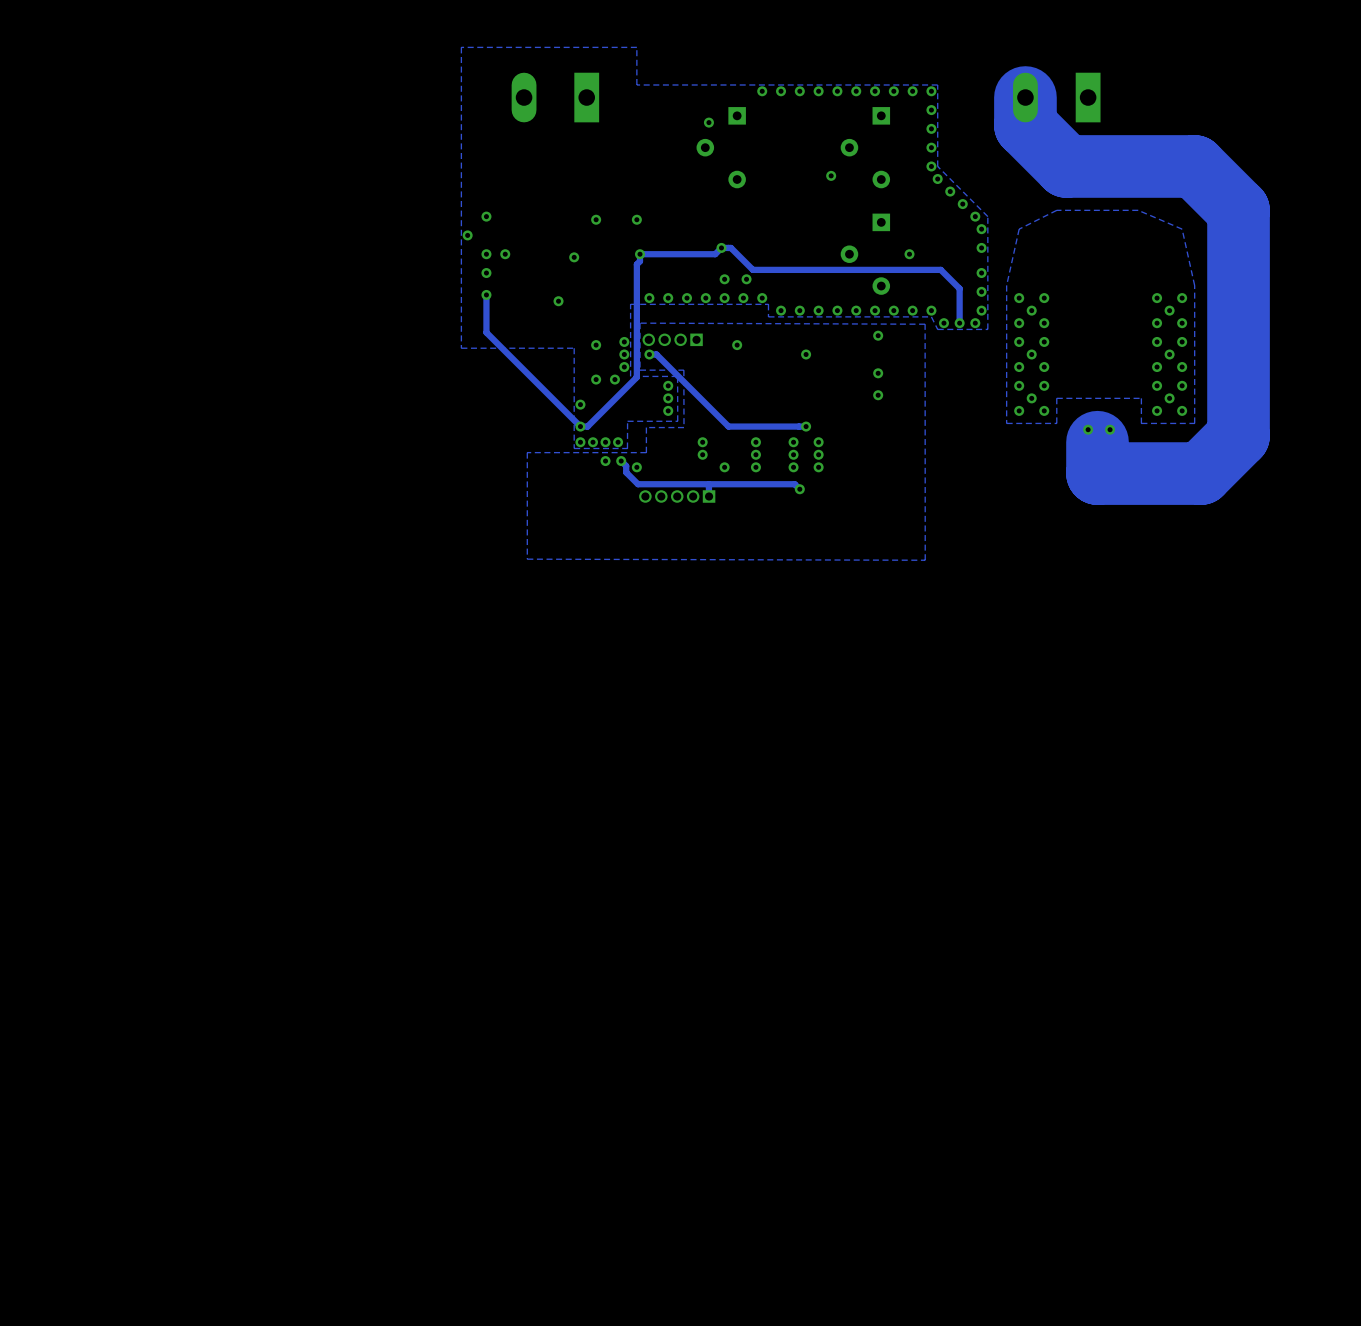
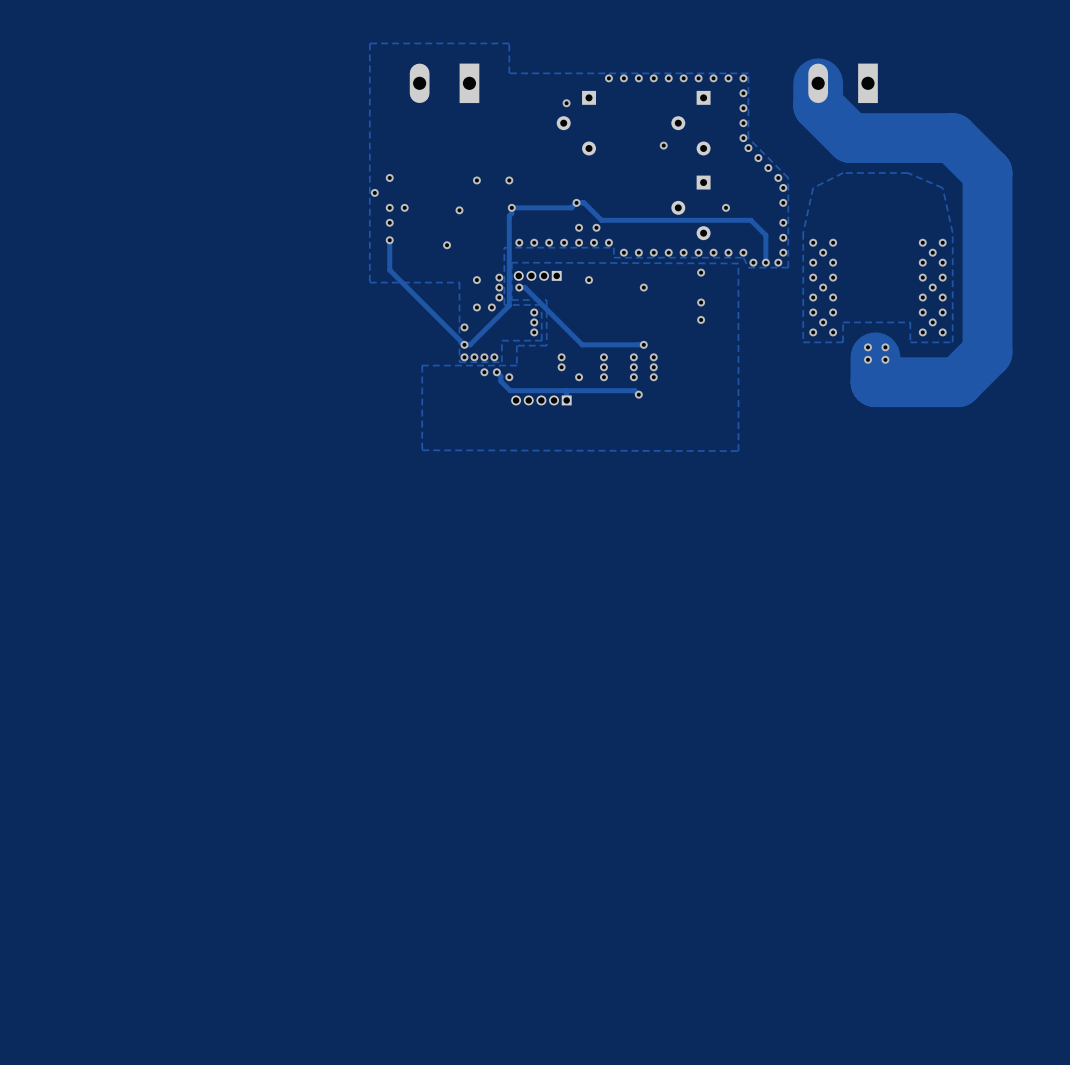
via: none -> (867, 359)
via: none -> (885, 359)

